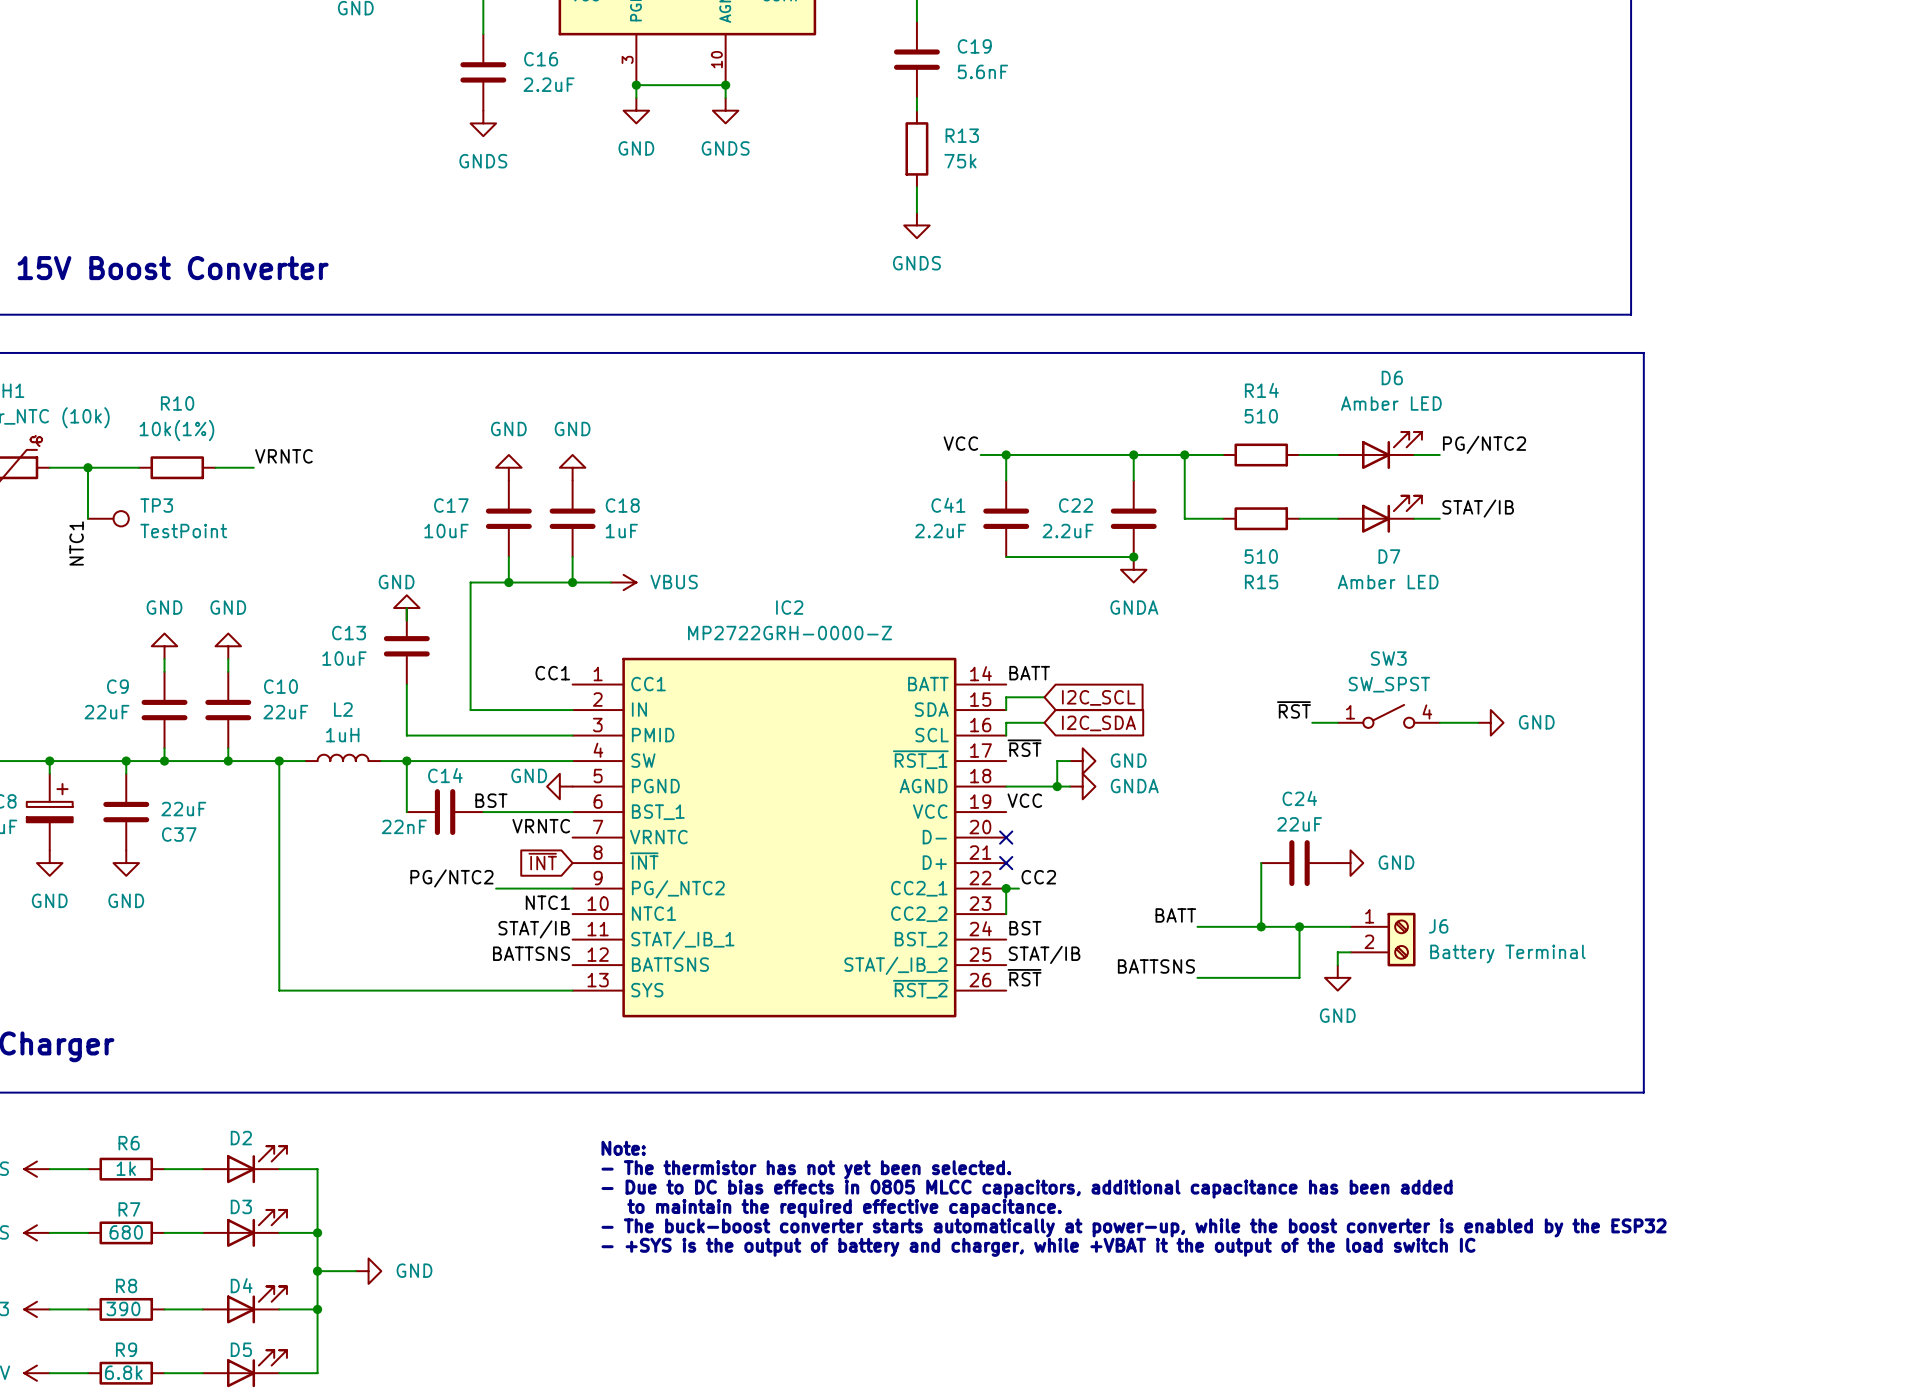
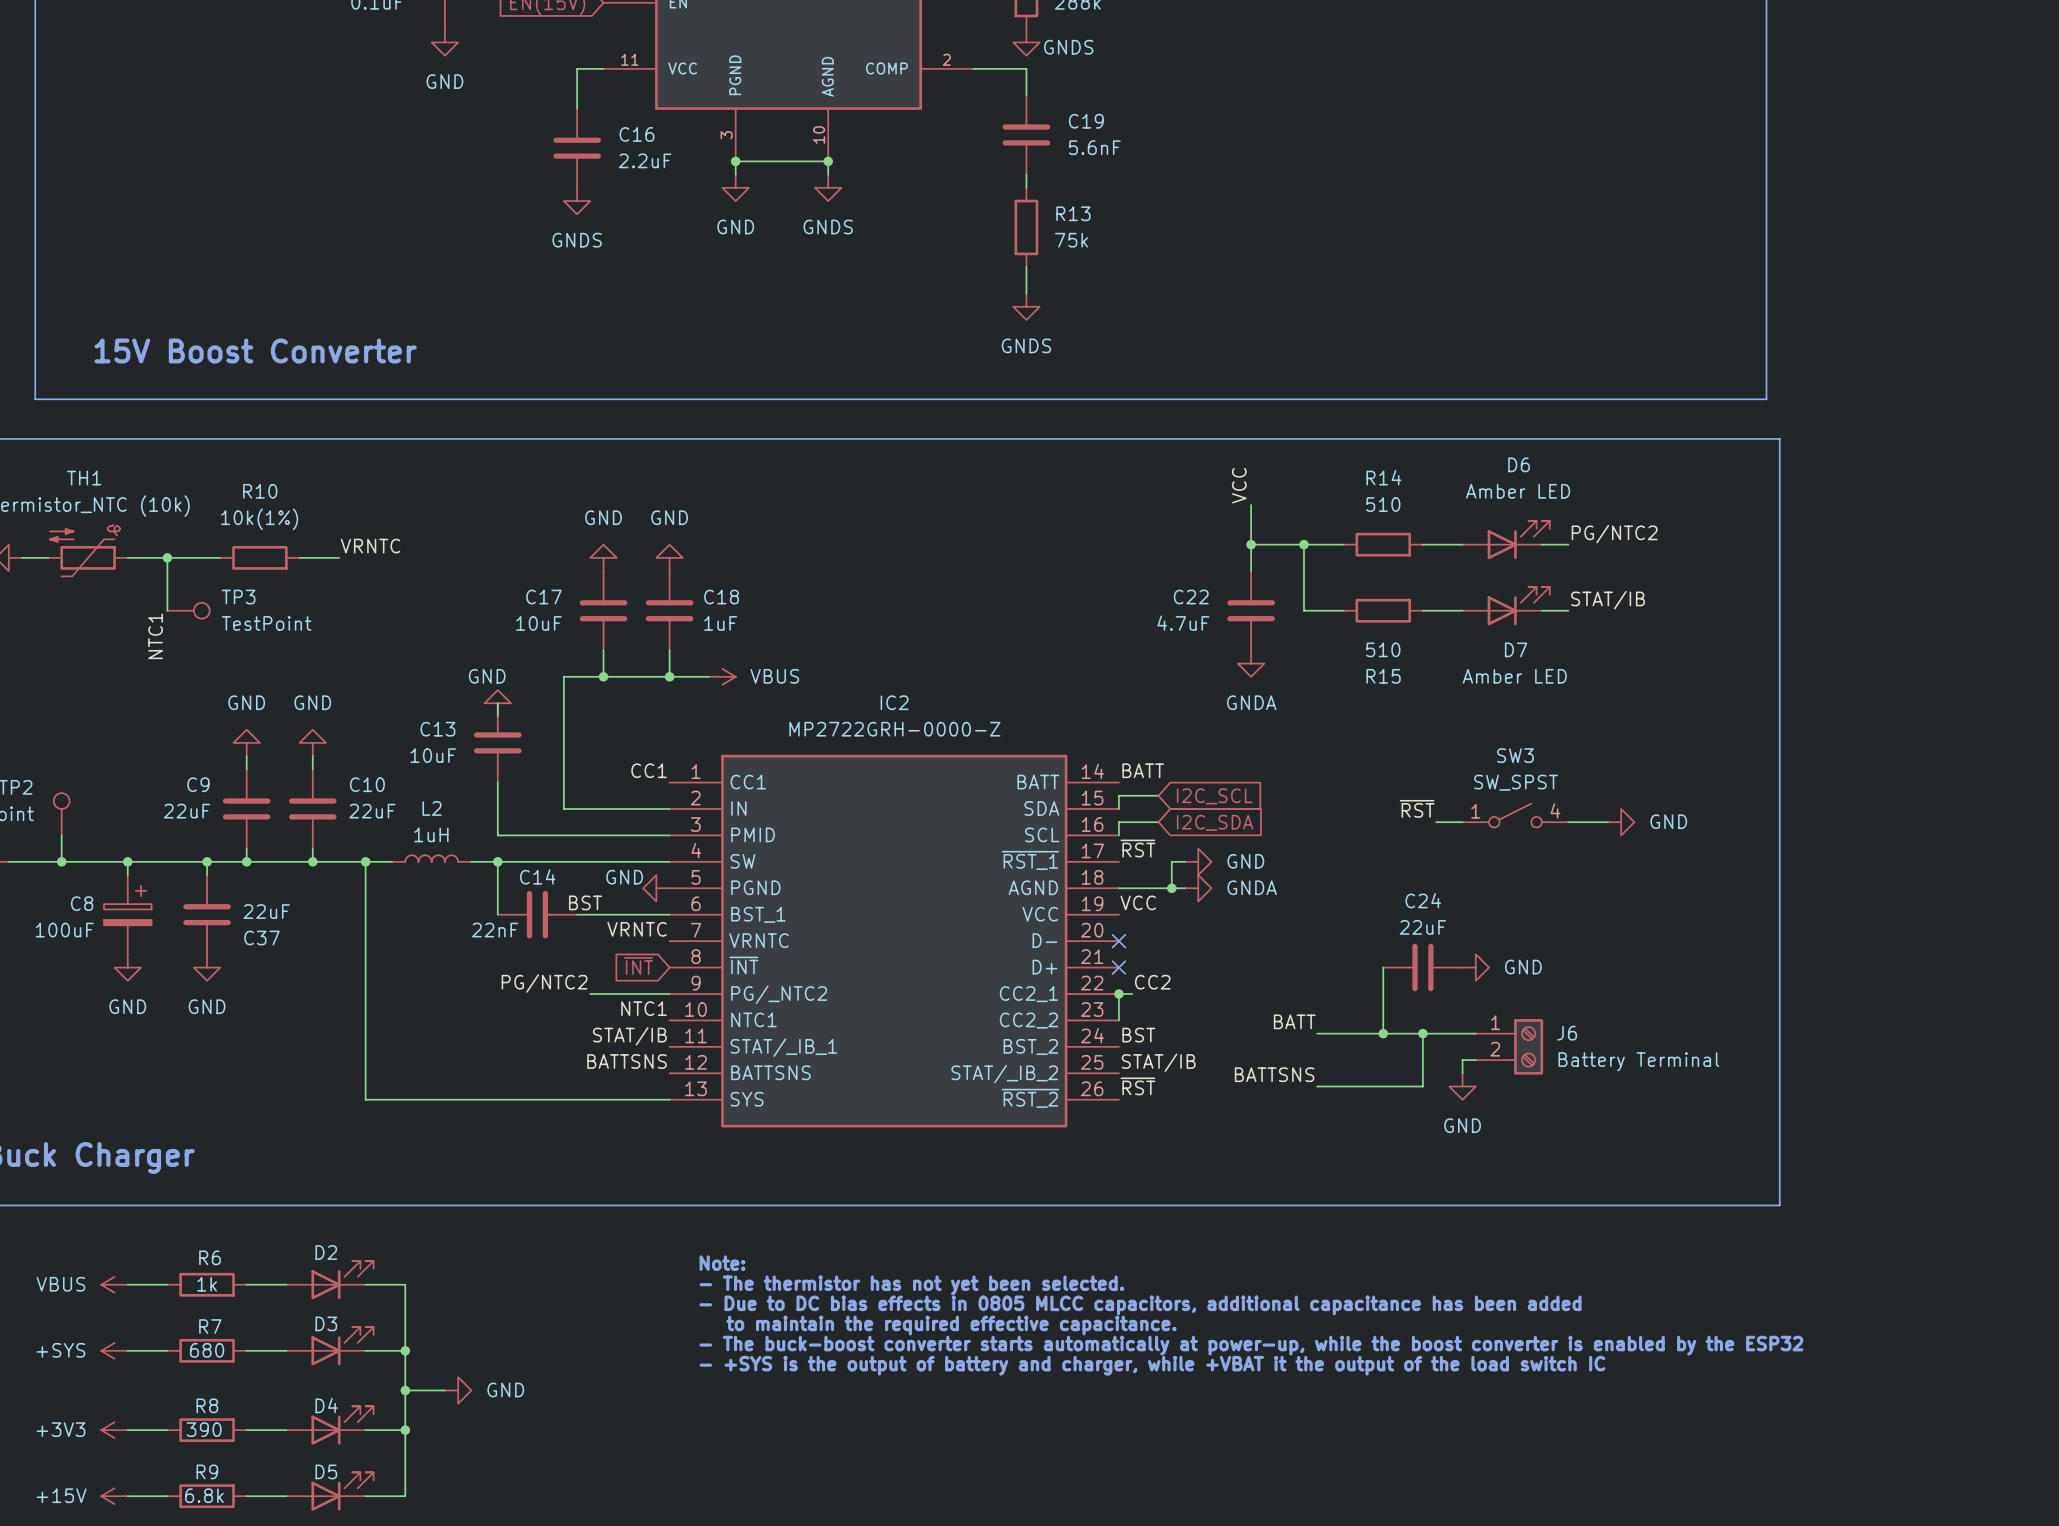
label rotation: 0° (960, 443) -> 90° counterclockwise (1239, 485)
label position: VCC (960, 443) -> VCC (1239, 485)
wire: (980, 454) (1133, 454) -> (1251, 505) (1251, 544)
wire: (1006, 454) (1006, 480) -> none
junction: (1006, 454) -> none
C41: 2.2uF (1006, 518) -> none
C22 value: 2.2uF (1068, 531) -> 4.7uF (1183, 623)
wire: (1006, 557) (1133, 557) -> none
junction: (1133, 557) -> none

